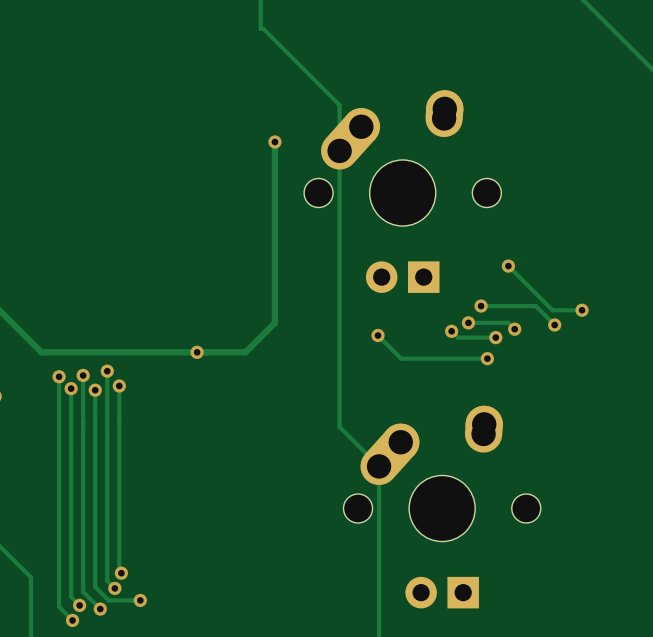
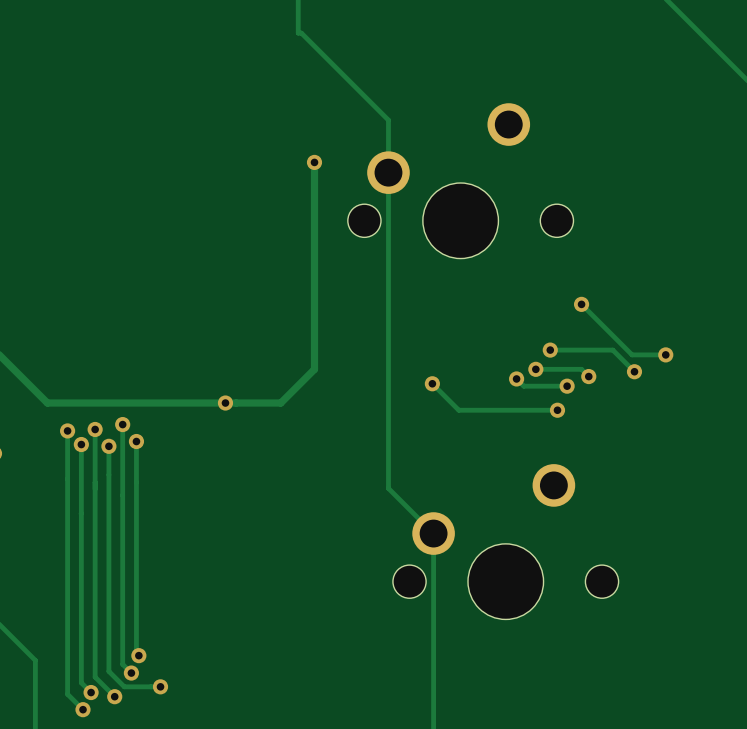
part: none -> (460, 180)
part: (402, 191) -> none
part: none -> (505, 541)
part: (442, 507) -> none

